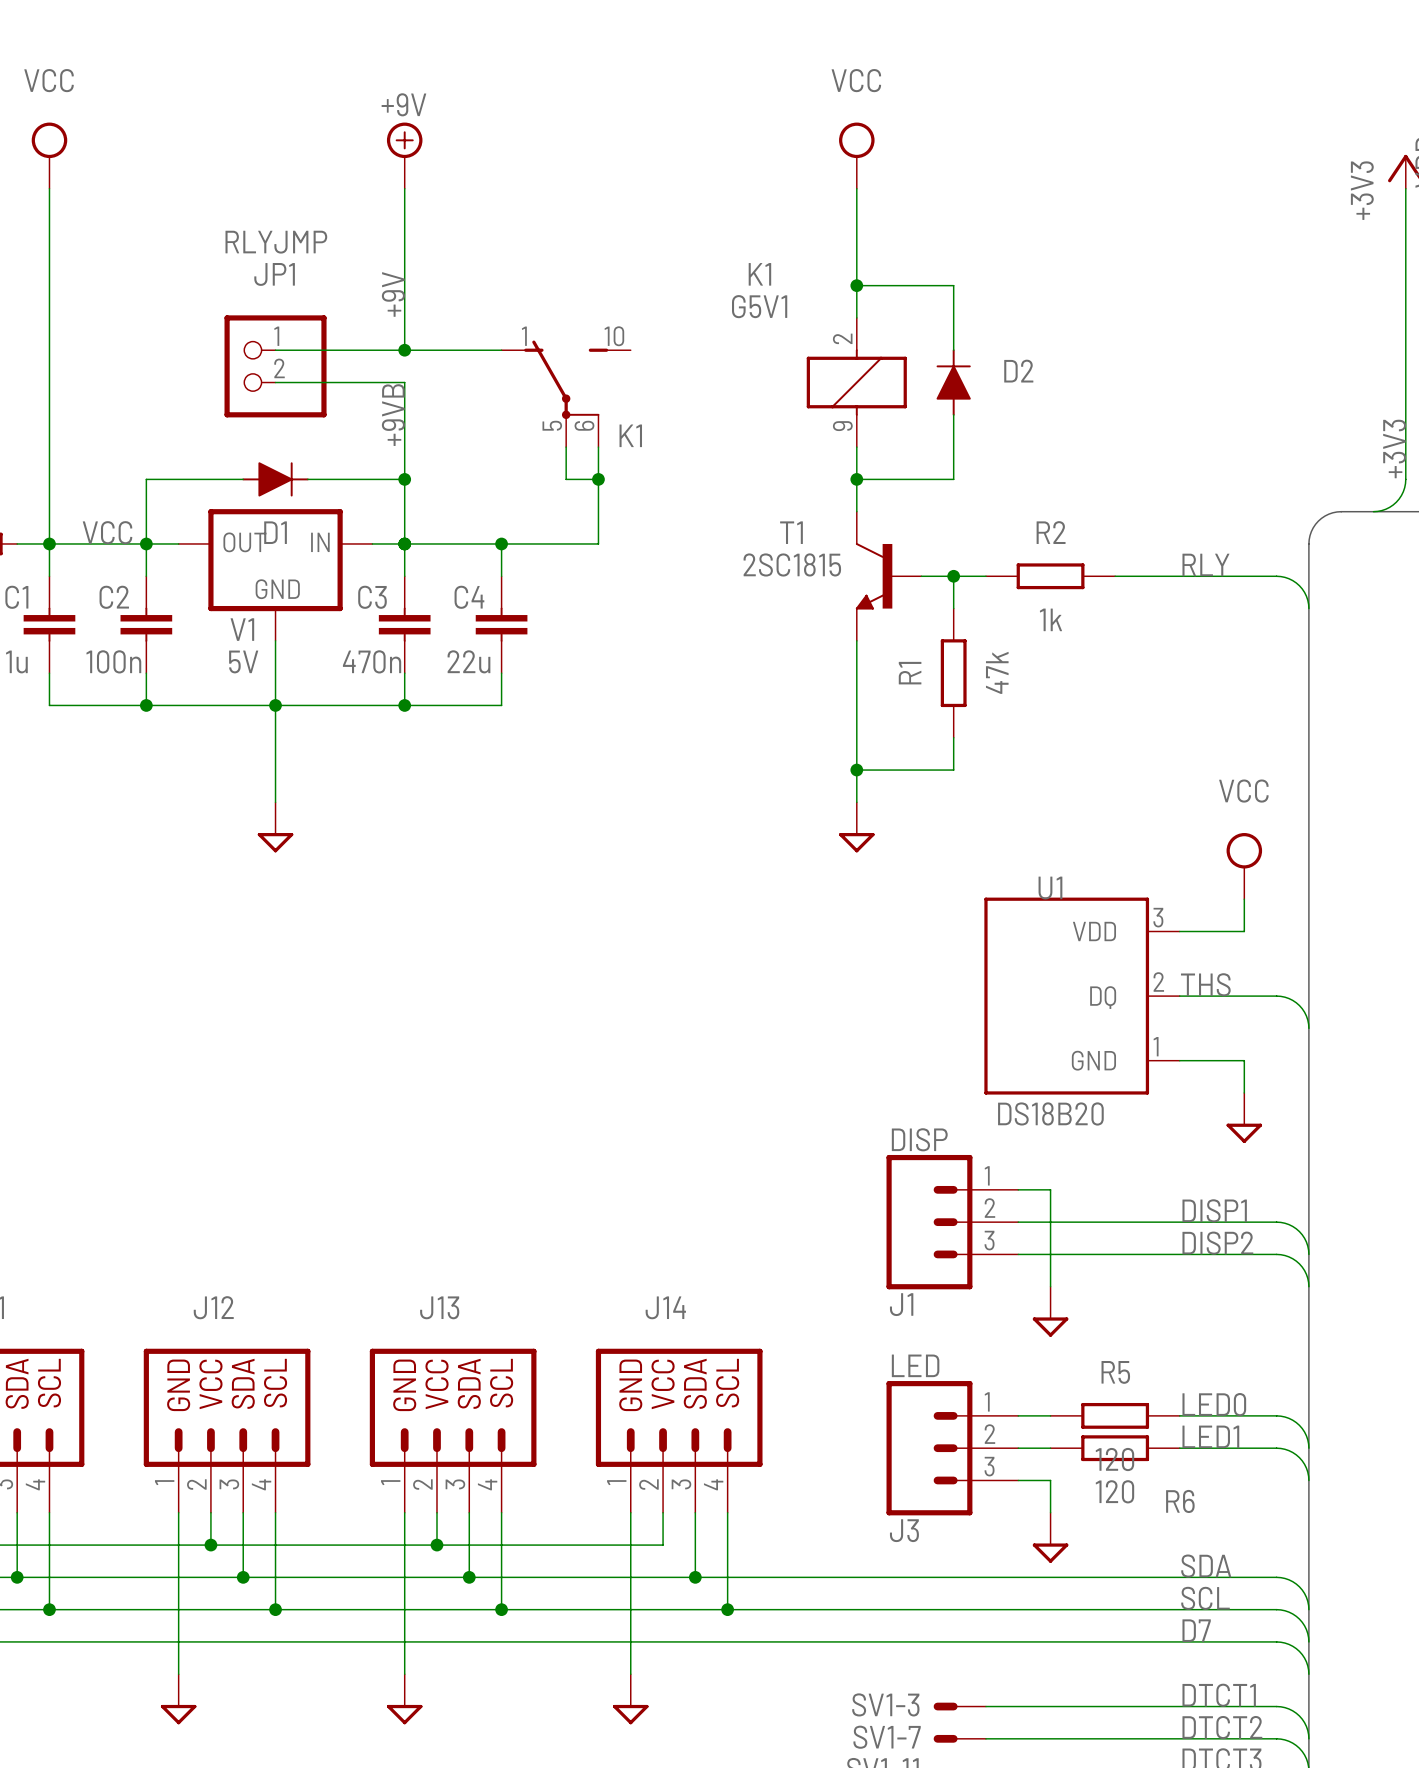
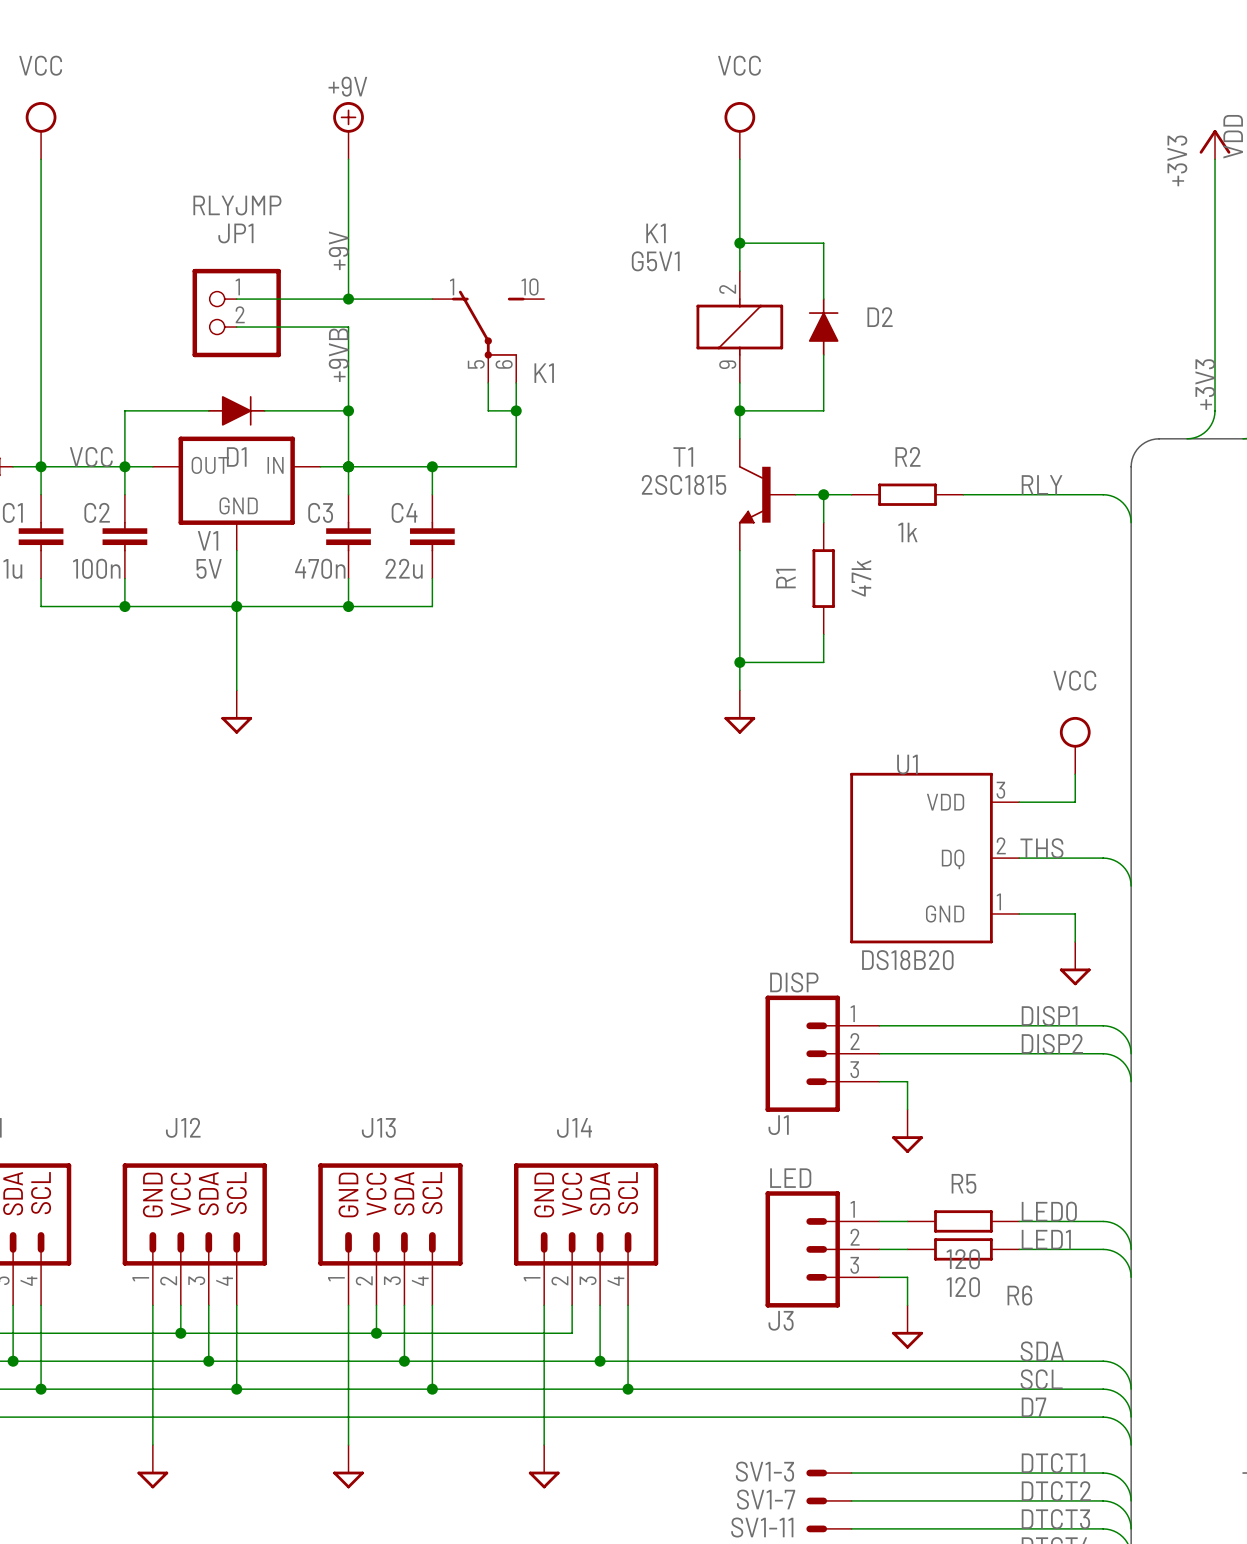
label: none -> DISP1 (1049, 1016)
wire: (1050, 1189) (1050, 1254) (1280, 1254) (1292, 1258) (1302, 1267) (1307, 1278) (1308, 1286) -> (907, 1025) (1106, 1026) (1117, 1029) (1125, 1036) (1131, 1053)
label: DISP1 (1214, 1210) -> DISP2 (1052, 1043)
label: DISP2 (1217, 1243) -> none

